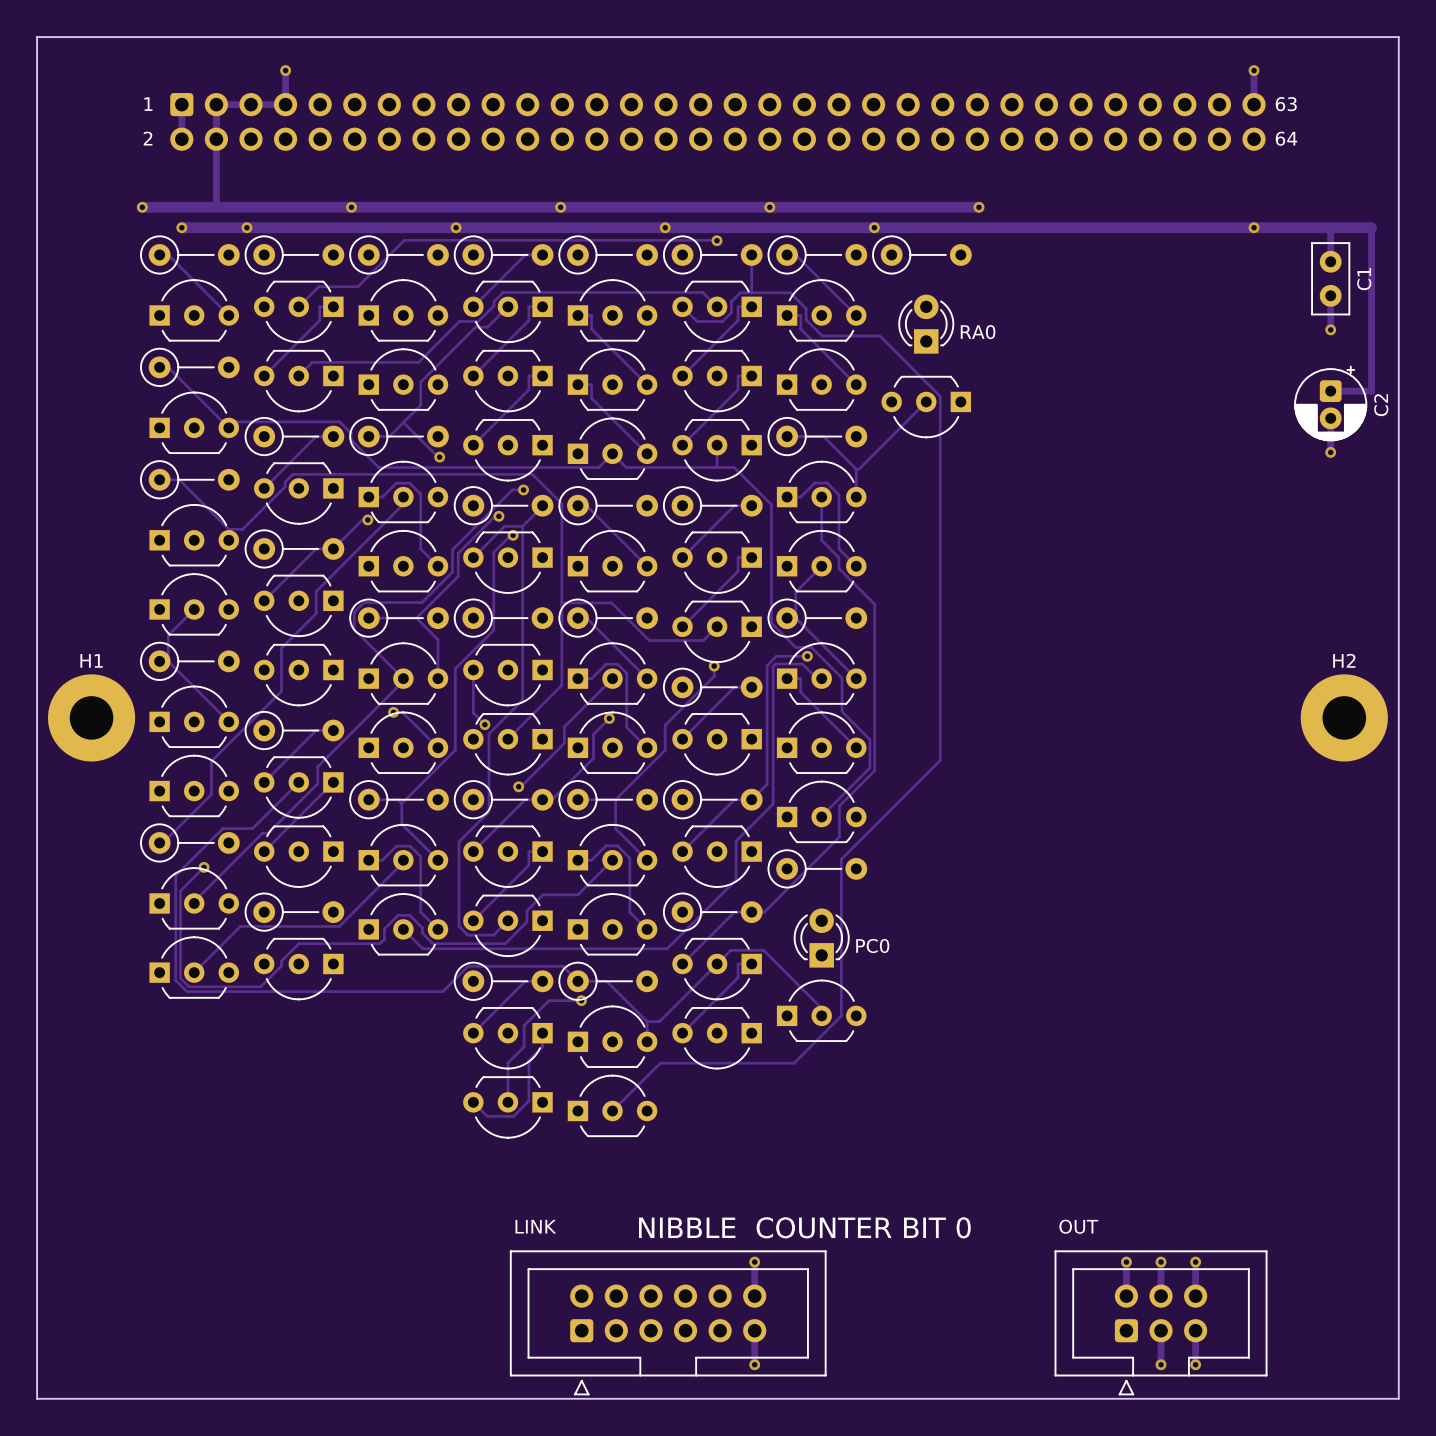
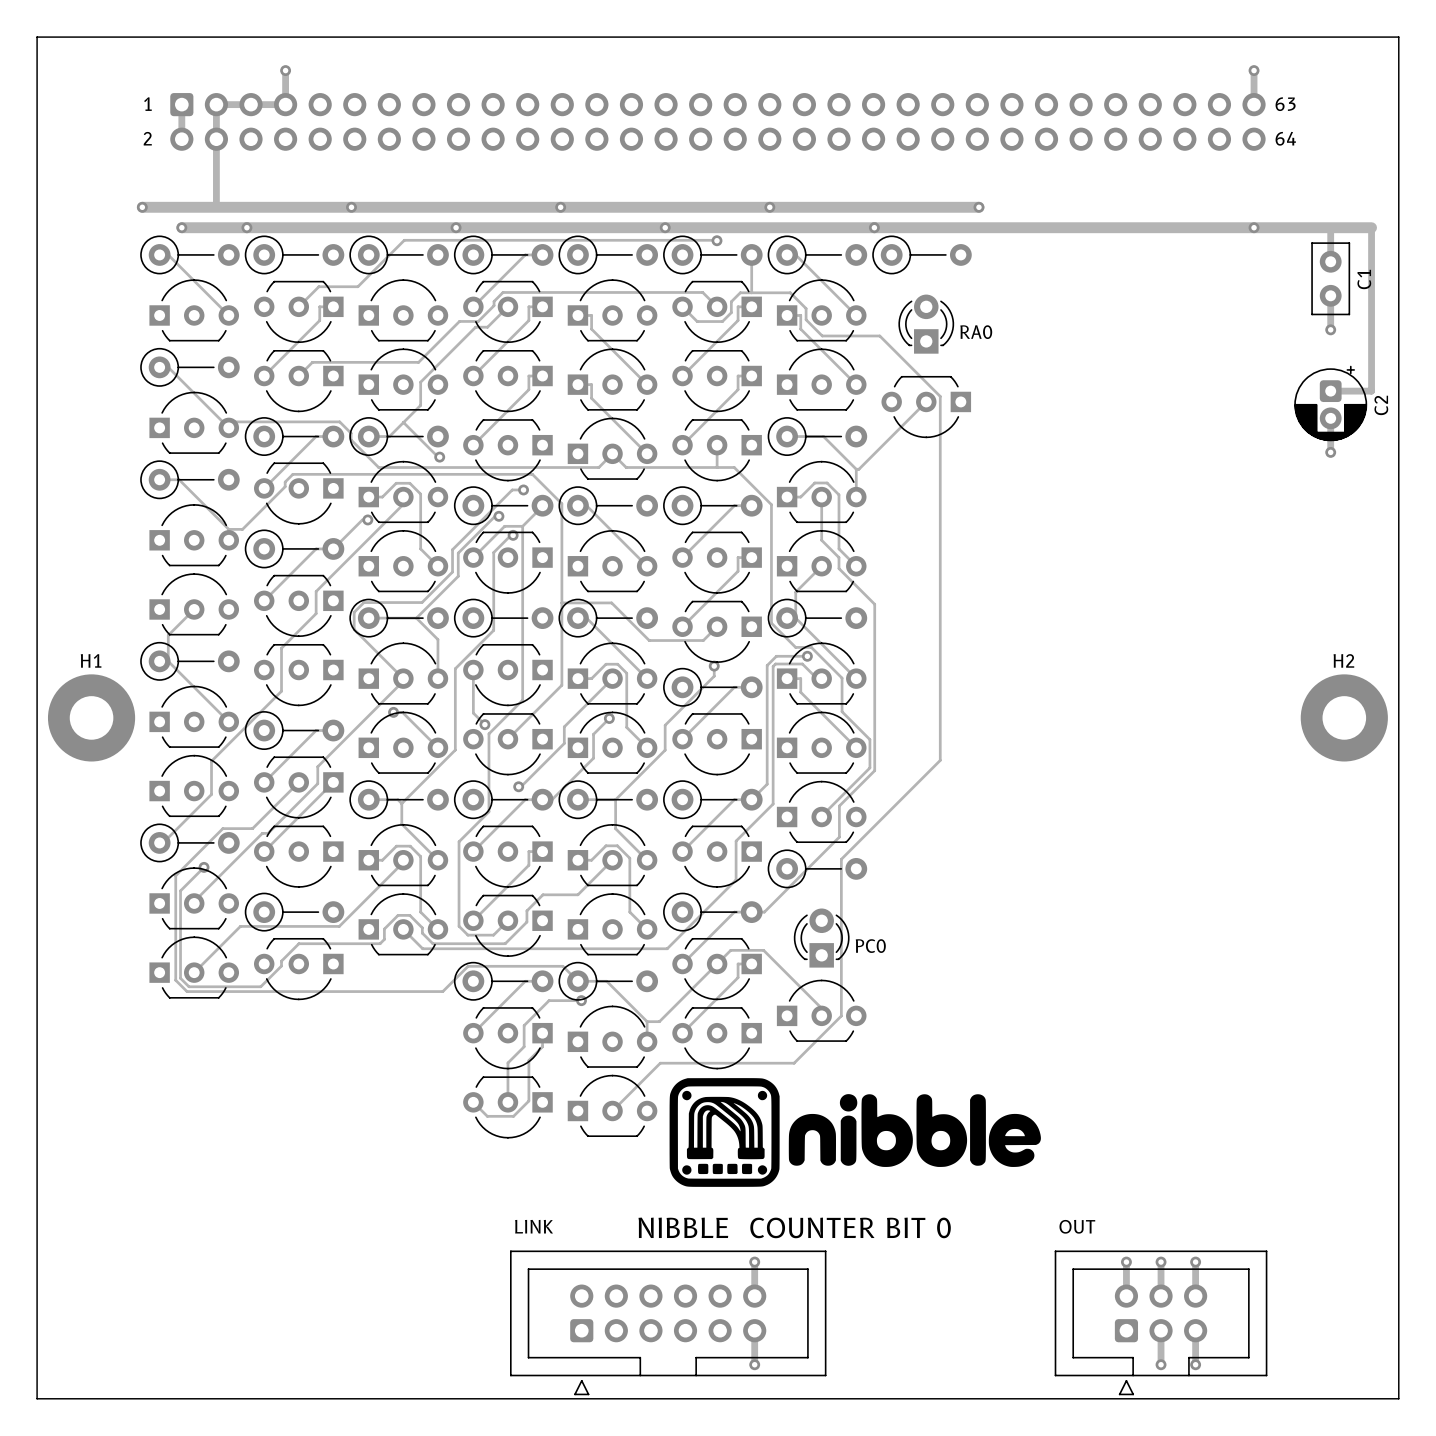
drawing: none -> [669, 1078, 1041, 1187]

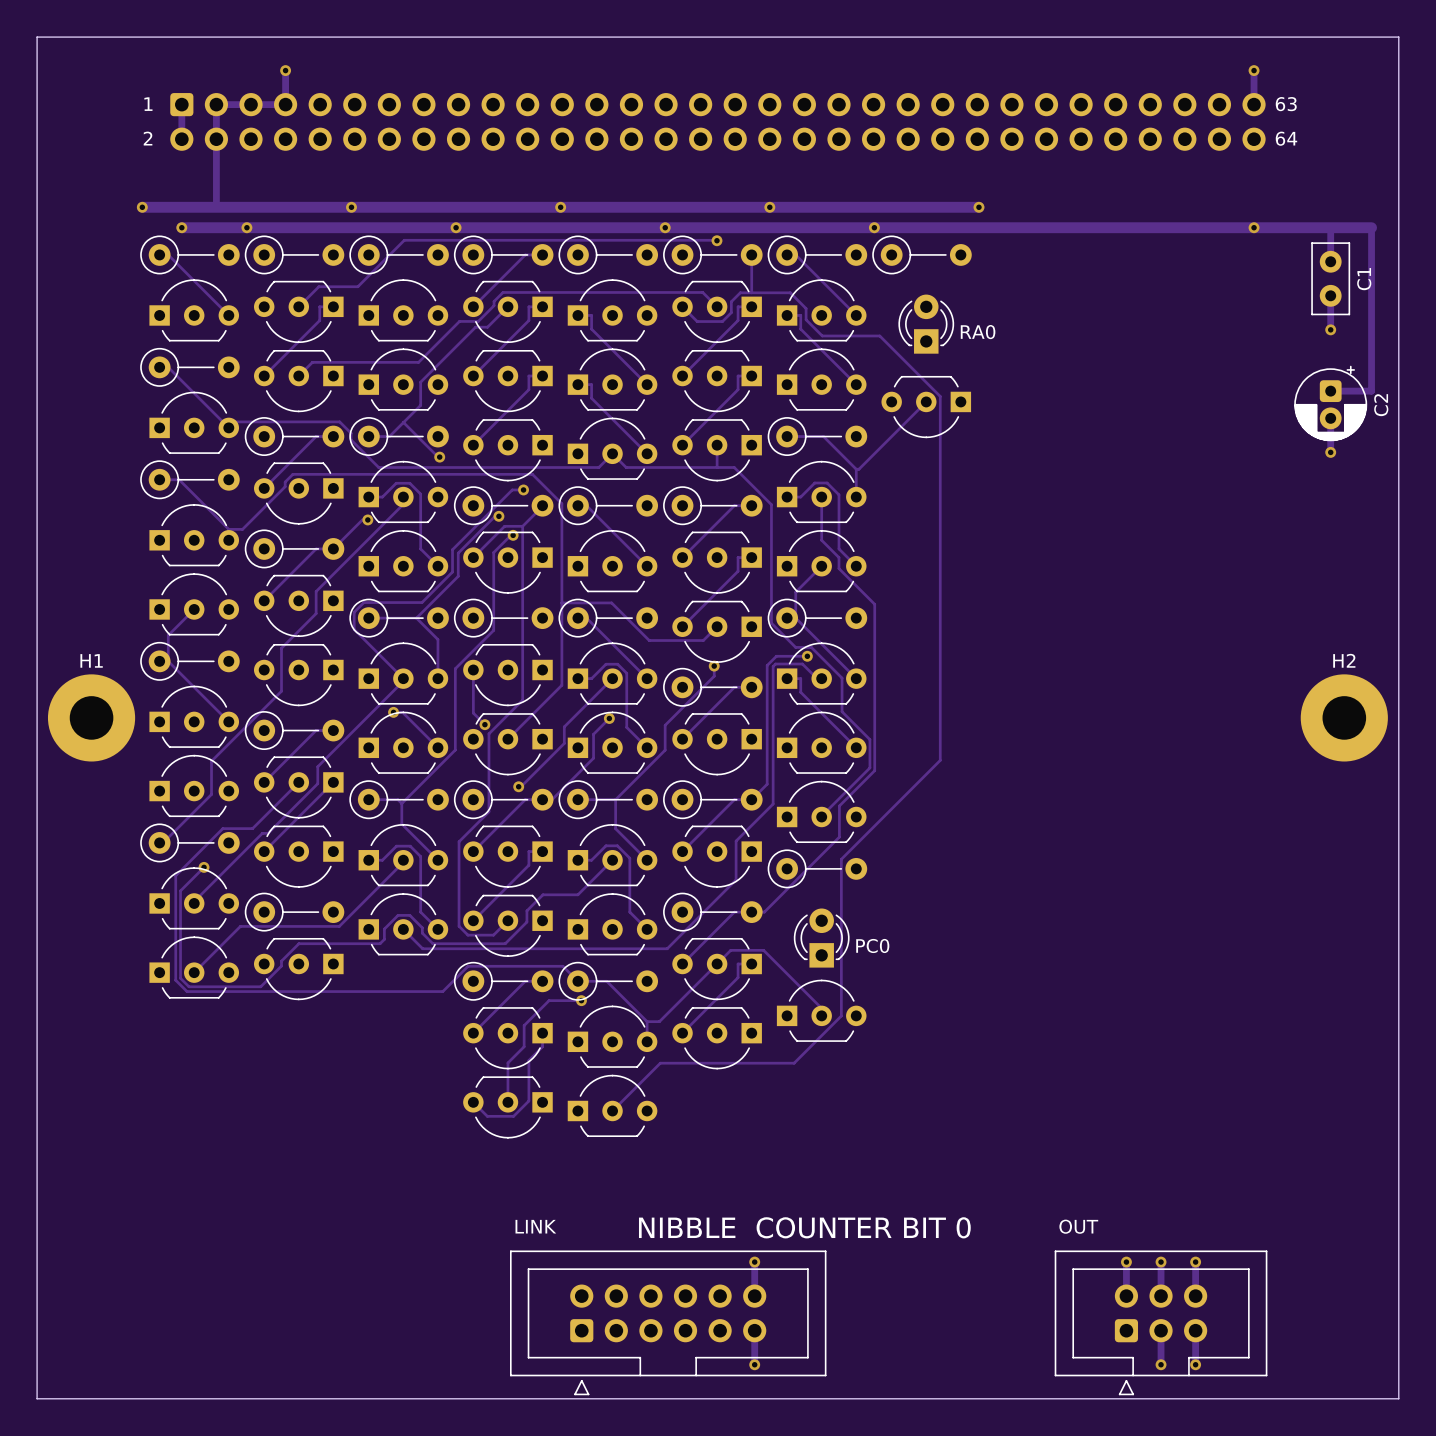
drawing: [669, 1078, 1041, 1187] -> none

